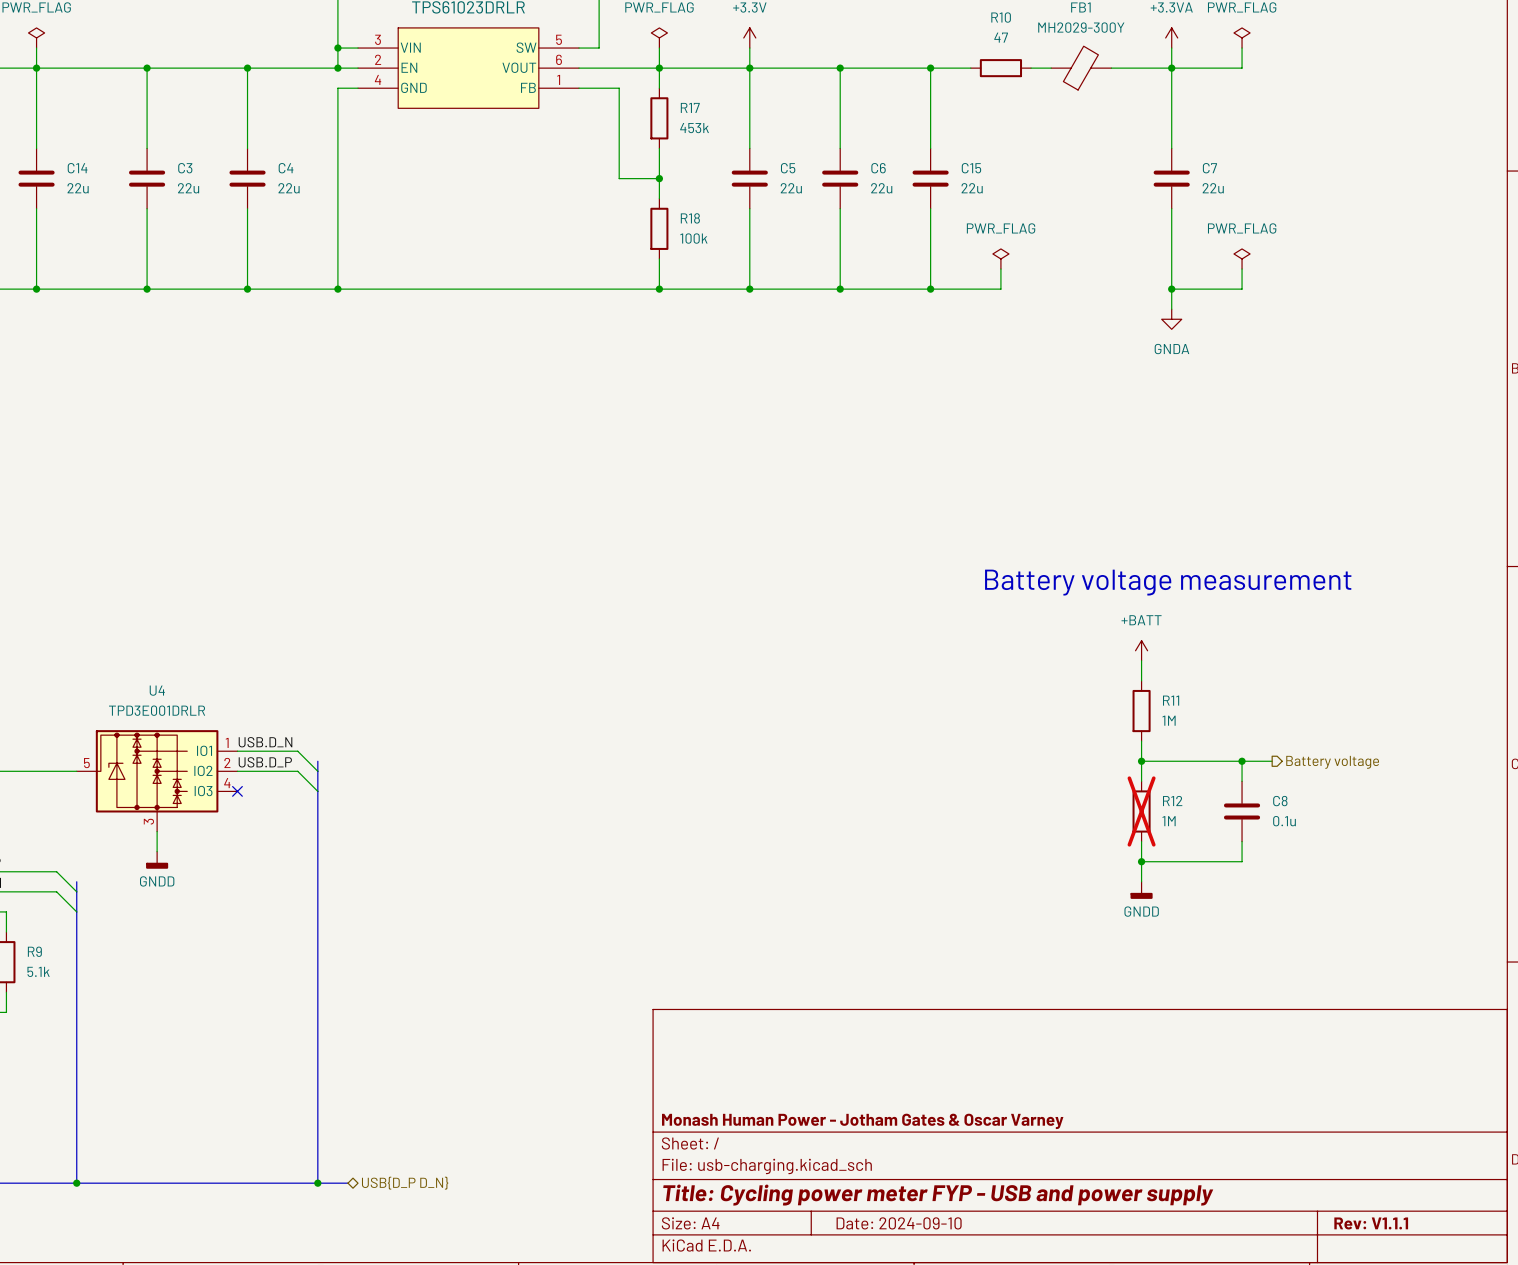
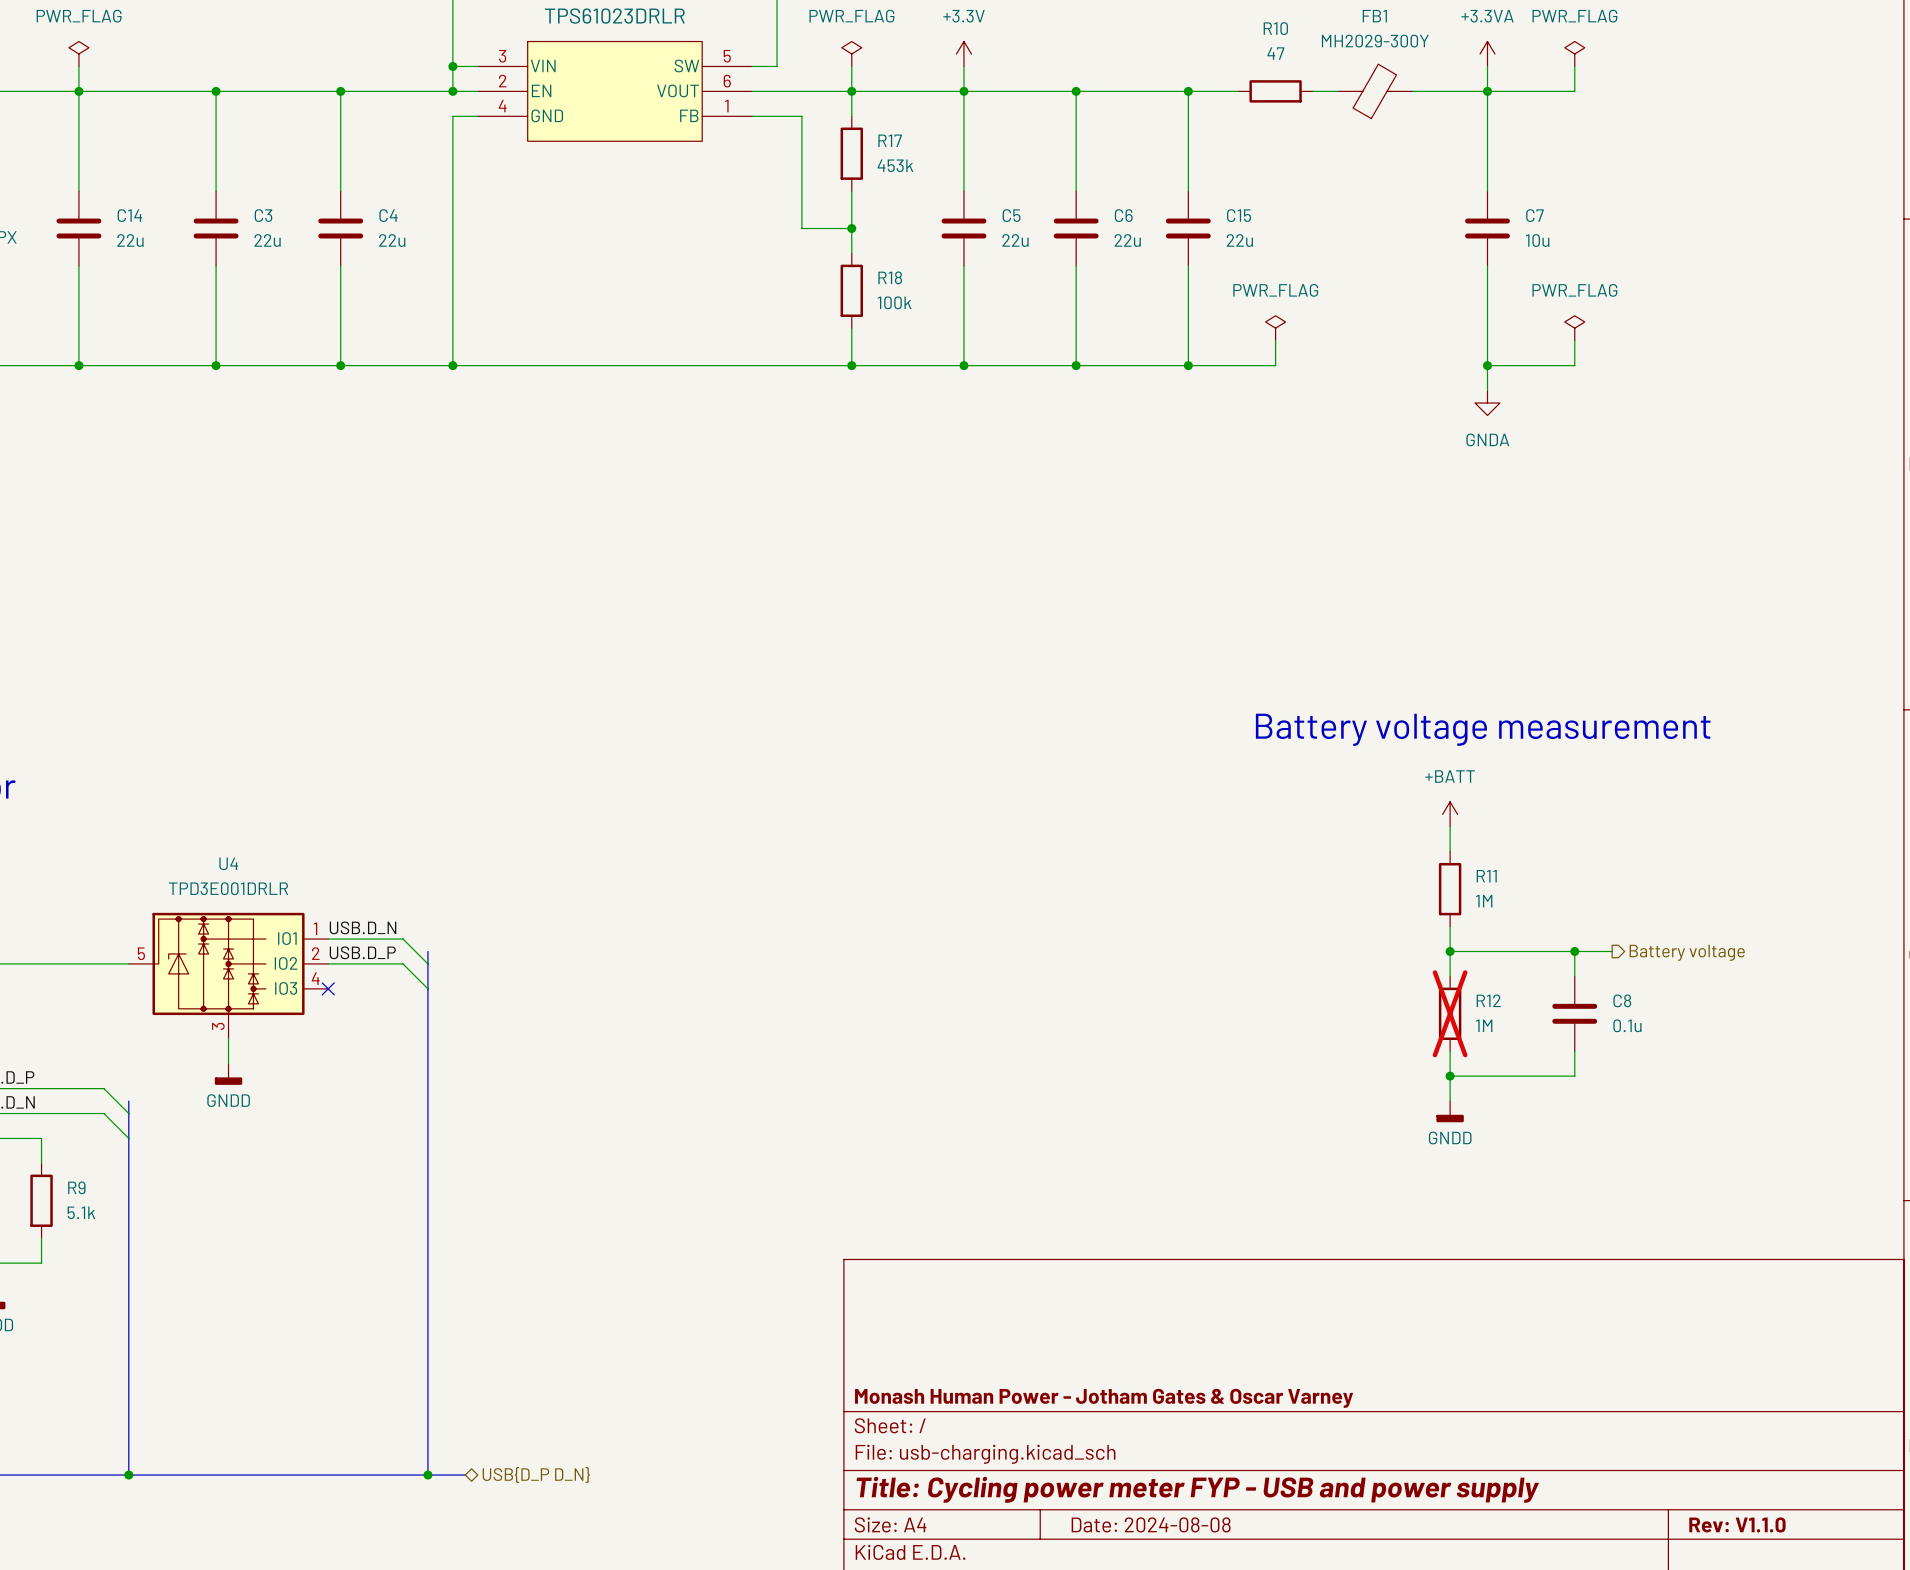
C7 value: 22u (1213, 188) -> 10u (1537, 240)
title block: Date: 2024-09-10 (899, 1223) -> Date: 2024-08-08 (1151, 1524)
title block: Rev: V1.1.1 (1371, 1223) -> Rev: V1.1.0 (1737, 1524)

